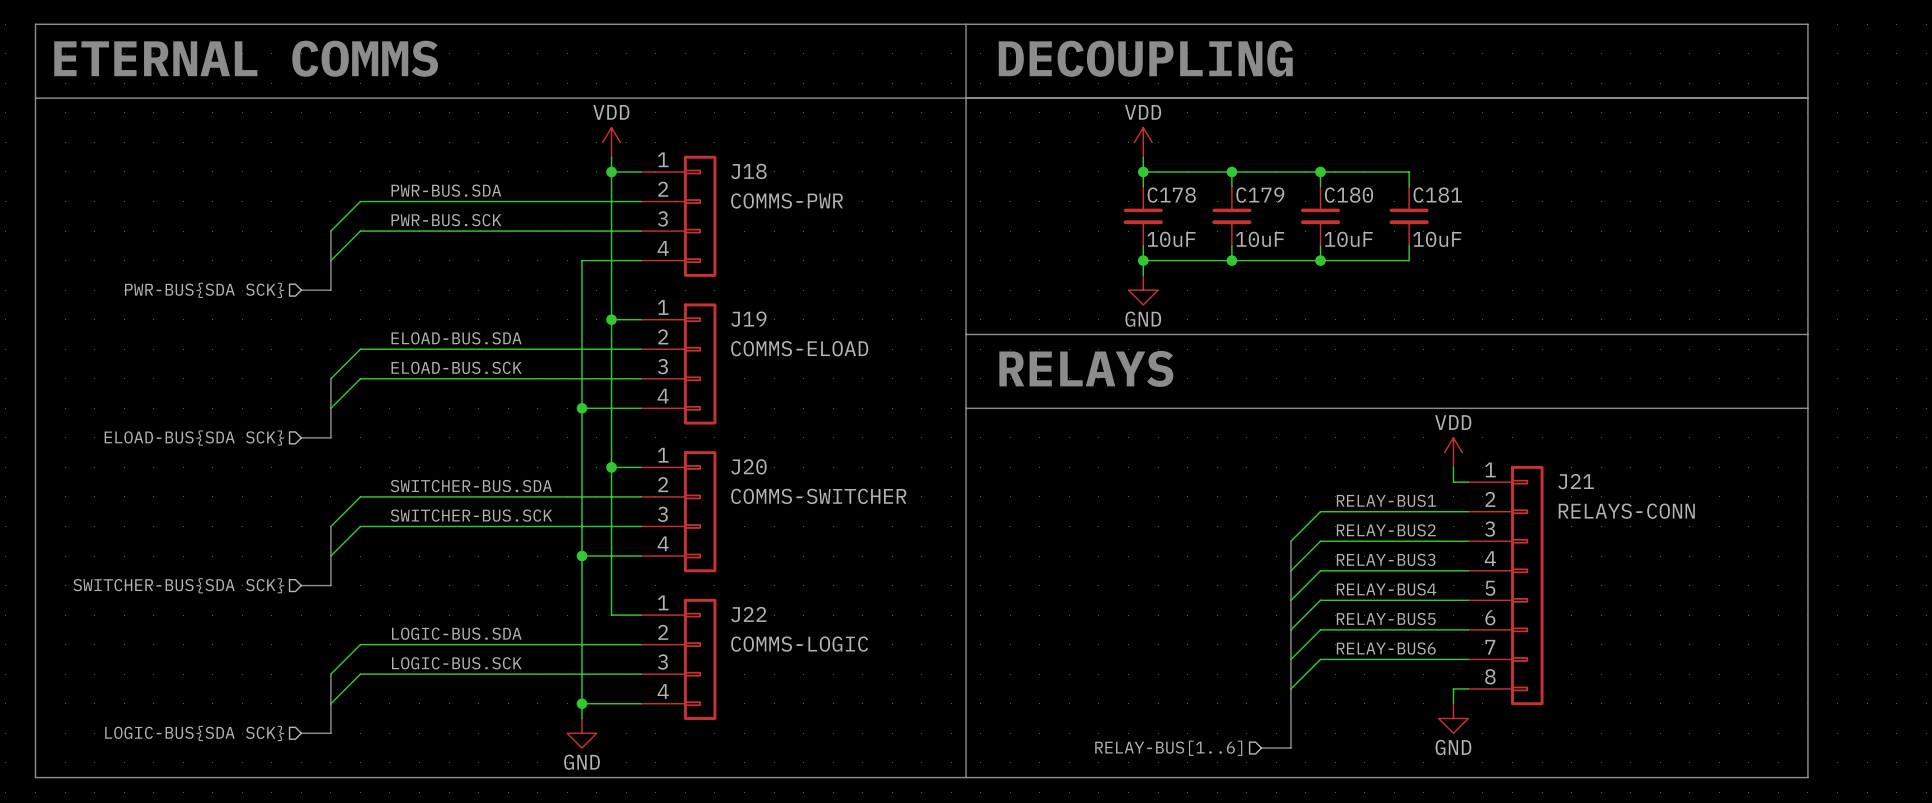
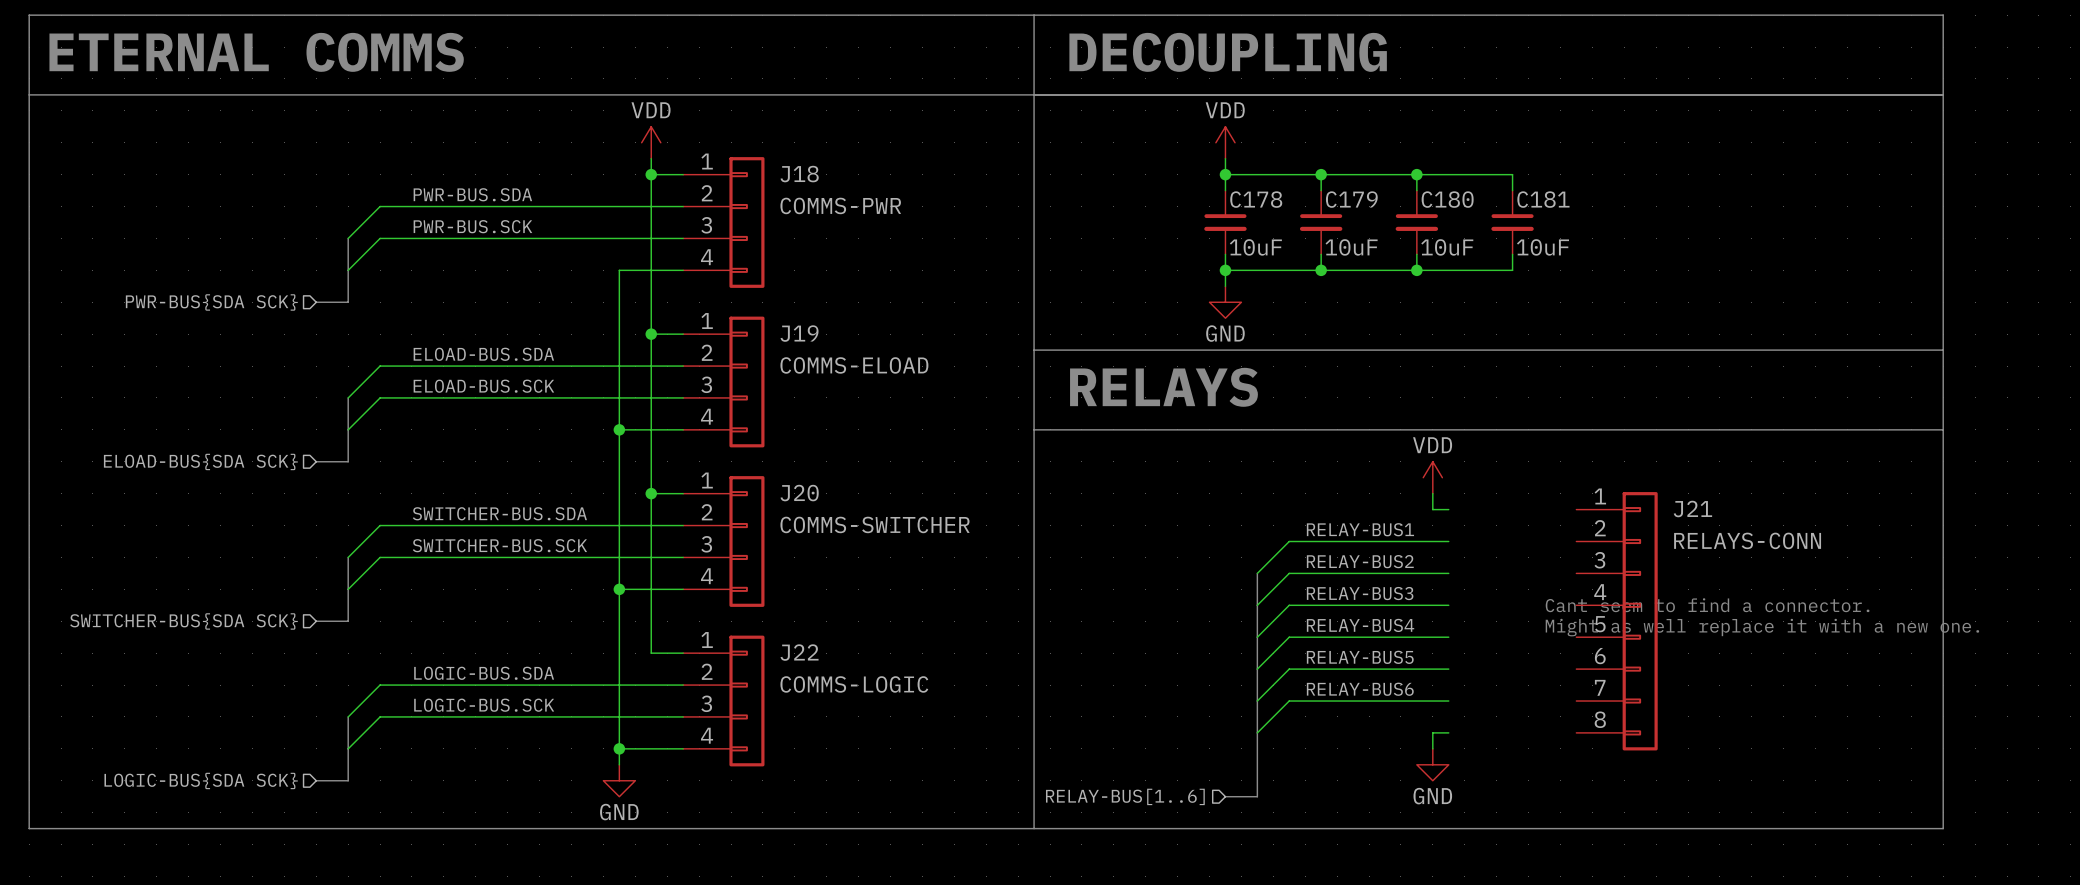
power symbol position: VDD (1453, 452) -> VDD (1432, 477)
wire: (1453, 467) (1453, 482) (1468, 482) -> (1432, 493) (1432, 509) (1448, 509)
label position: RELAY-BUS1 (1386, 500) -> RELAY-BUS1 (1360, 529)
wire: (1320, 511) (1290, 541) -> (1416, 541) (1289, 541) (1257, 573)
wire: (1350, 511) (1468, 511) -> none
label position: RELAY-BUS2 (1386, 530) -> RELAY-BUS2 (1360, 561)
bus: (1290, 541) (1290, 748) (1261, 748) -> (1257, 573) (1257, 796) (1225, 796)
wire: (1320, 541) (1290, 570) -> (1416, 573) (1289, 573) (1257, 605)
wire: (1350, 541) (1468, 541) -> none
label position: RELAY-BUS3 (1386, 559) -> RELAY-BUS3 (1360, 593)
wire: (1320, 570) (1290, 600) -> (1416, 605) (1289, 605) (1257, 637)
wire: (1350, 570) (1468, 570) -> none
text: none -> Cant seem to find a connector. (1707, 605)
label position: RELAY-BUS4 (1386, 589) -> RELAY-BUS4 (1360, 625)
text: none -> Might as well replace it with a new one. (1762, 627)
wire: (1320, 600) (1290, 629) -> (1416, 637) (1289, 637) (1257, 669)
wire: (1350, 600) (1468, 600) -> none
label position: RELAY-BUS5 (1386, 618) -> RELAY-BUS5 (1360, 657)
wire: (1320, 629) (1290, 659) -> (1416, 669) (1289, 669) (1257, 701)
wire: (1350, 629) (1468, 629) -> none
label position: RELAY-BUS6 (1386, 648) -> RELAY-BUS6 (1360, 689)
wire: (1320, 659) (1290, 688) -> (1416, 701) (1289, 701) (1257, 732)
wire: (1350, 659) (1468, 659) -> none
wire: (1468, 688) (1453, 688) (1453, 703) -> (1448, 732) (1432, 732) (1432, 748)
power symbol position: GND (1453, 718) -> GND (1432, 764)
hierarchical label position: RELAY-BUS[1..6] (1168, 748) -> RELAY-BUS[1..6] (1125, 796)

